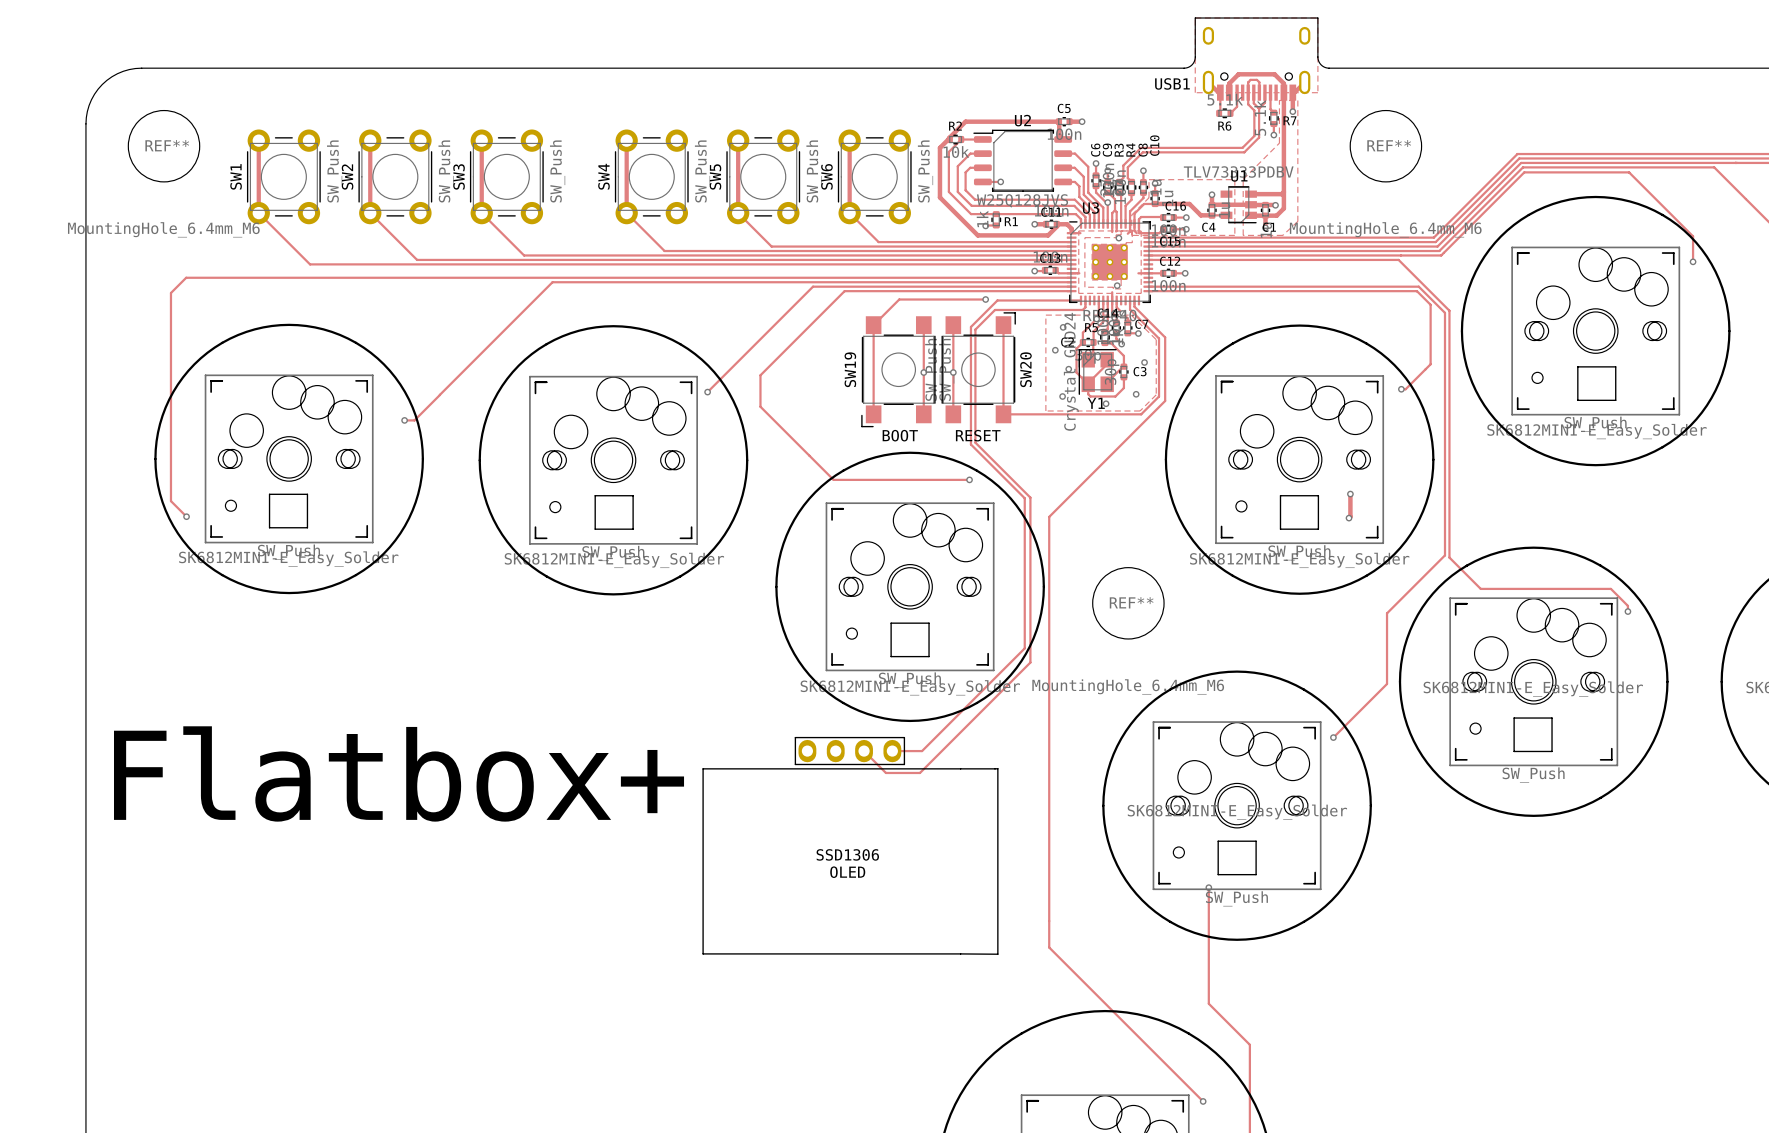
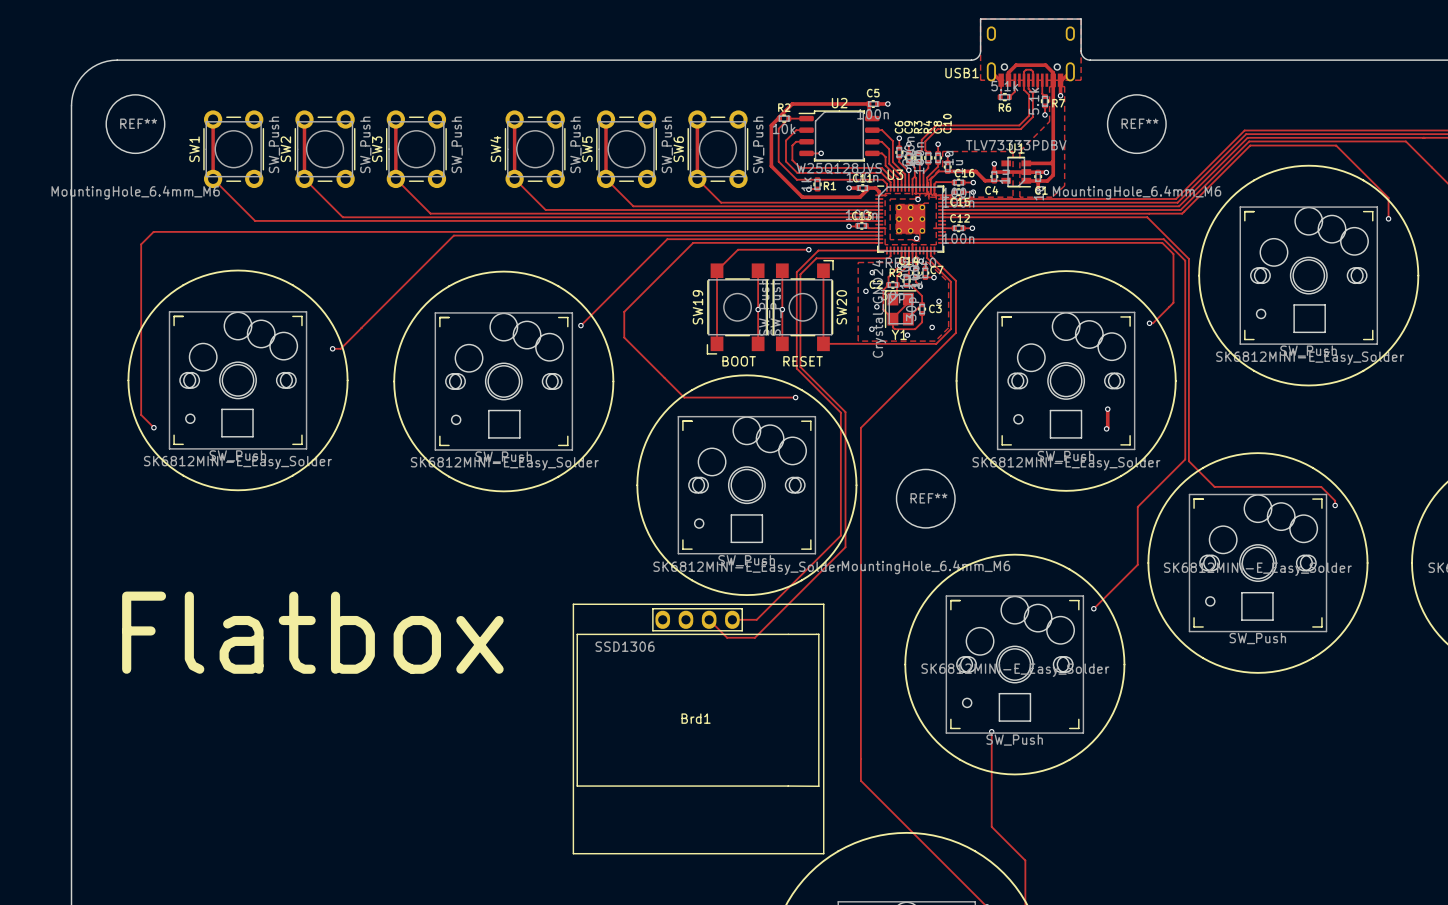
text: Flatbox+ (399, 773) -> Flatbox (312, 632)
OLED: SSD1306 (850, 845) -> none
Brd1: none -> SSD1306 (698, 728)

